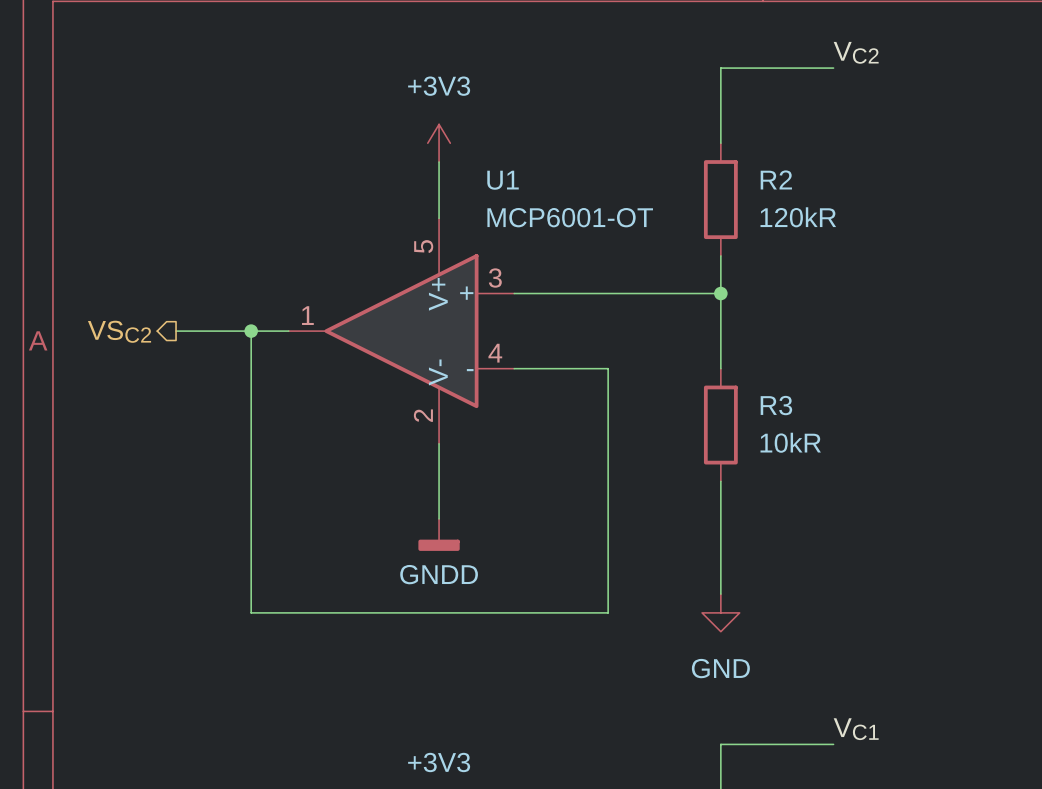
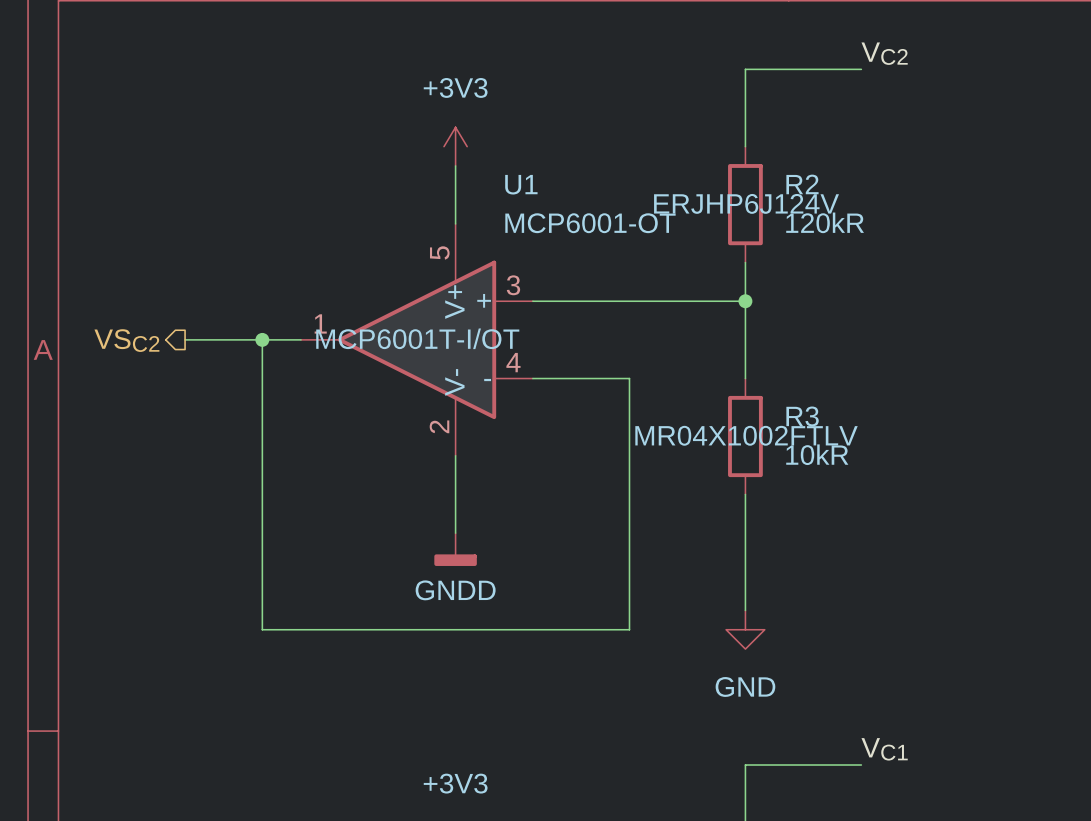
R2 text: none -> ERJHP6J124V (746, 203)
U1 text: none -> MCP6001T-I/OT (417, 338)
R3 text: none -> MR04X1002FTLV (746, 435)

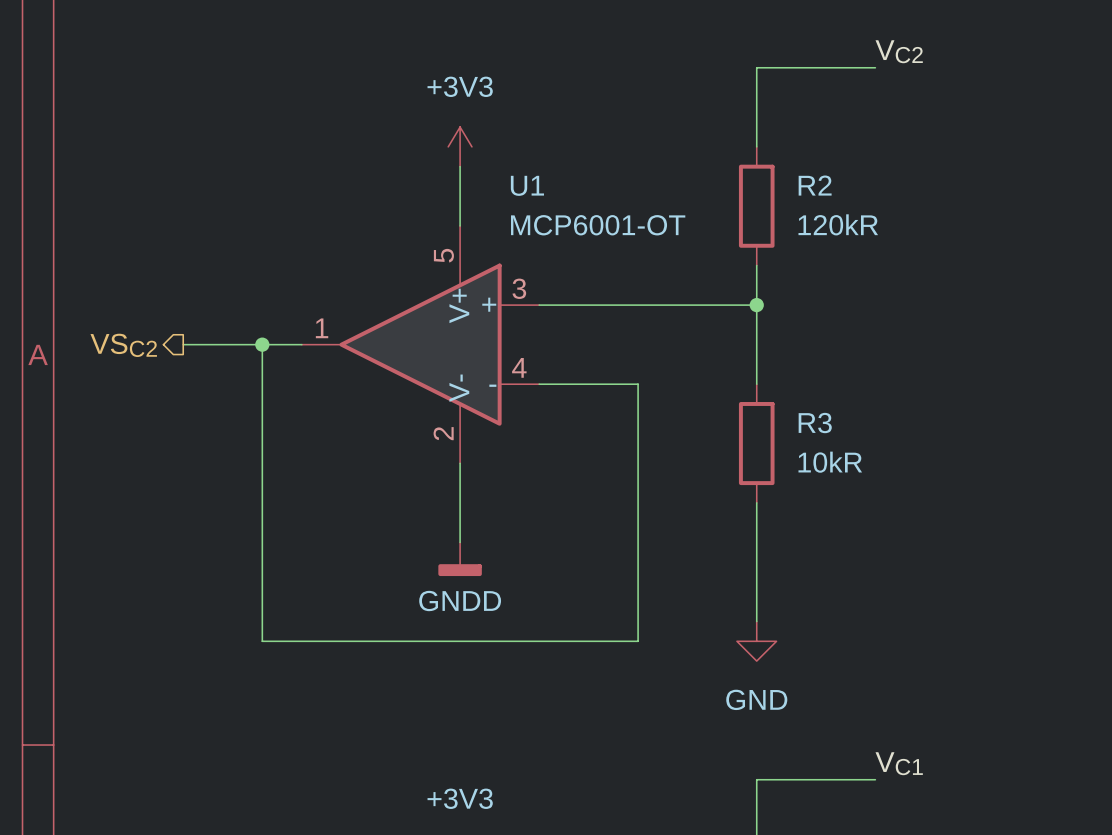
R2 text: ERJHP6J124V (746, 203) -> none
U1 text: MCP6001T-I/OT (417, 338) -> none
R3 text: MR04X1002FTLV (746, 435) -> none

